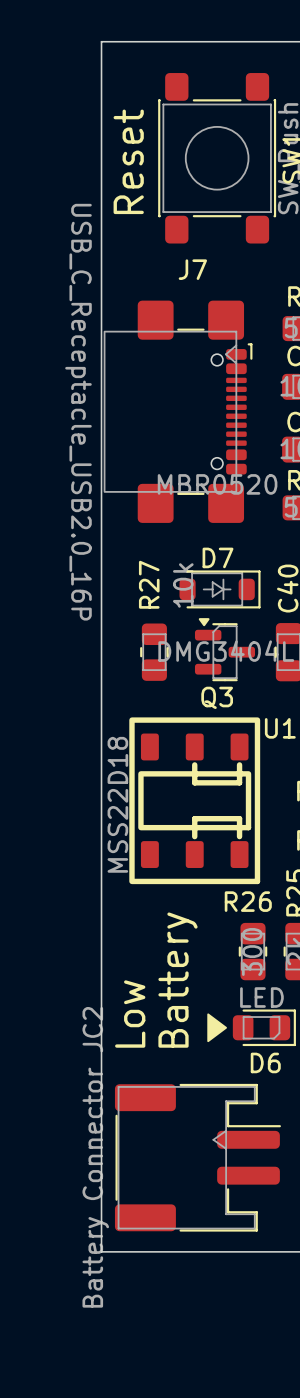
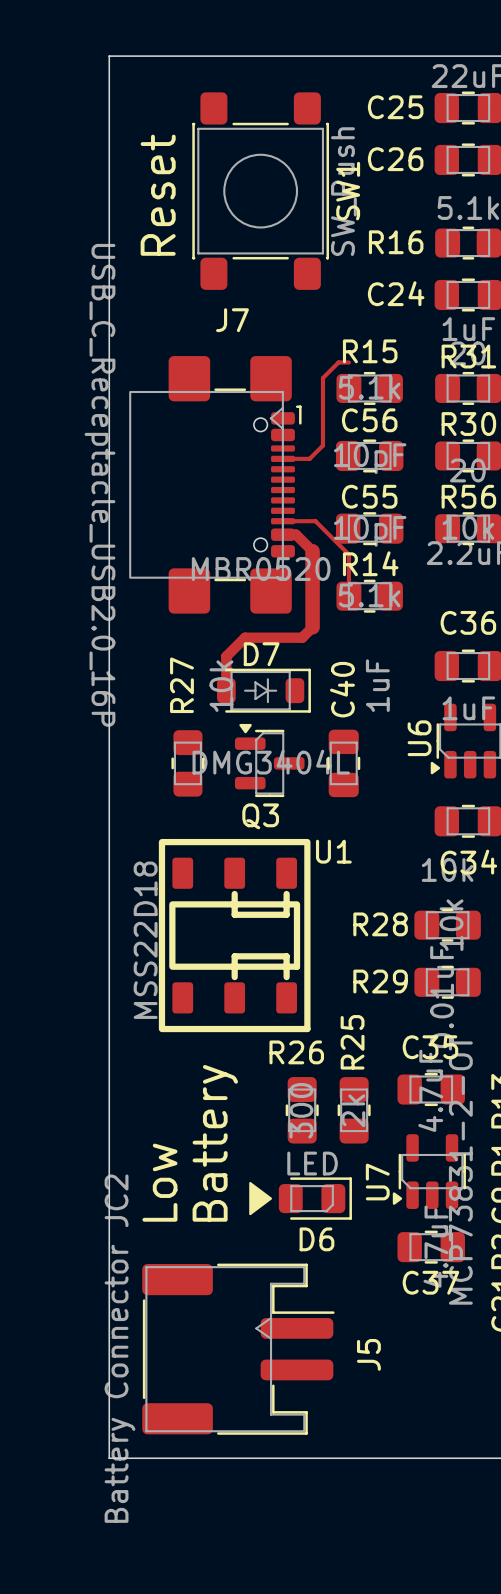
board edge: (101, 41) (101, 1251) -> (126, 56) (109, 56) (109, 1458) (126, 1458)
track: none -> (348, 362) (338, 362) (322, 378) (322, 445) (309, 458) (282, 458)
track: none -> (282, 521) (315, 521) (348, 554) (348, 590)
track: none -> (282, 534) (296, 534) (312, 551) (312, 627) (302, 637) (245, 637) (226, 656) (226, 690)

